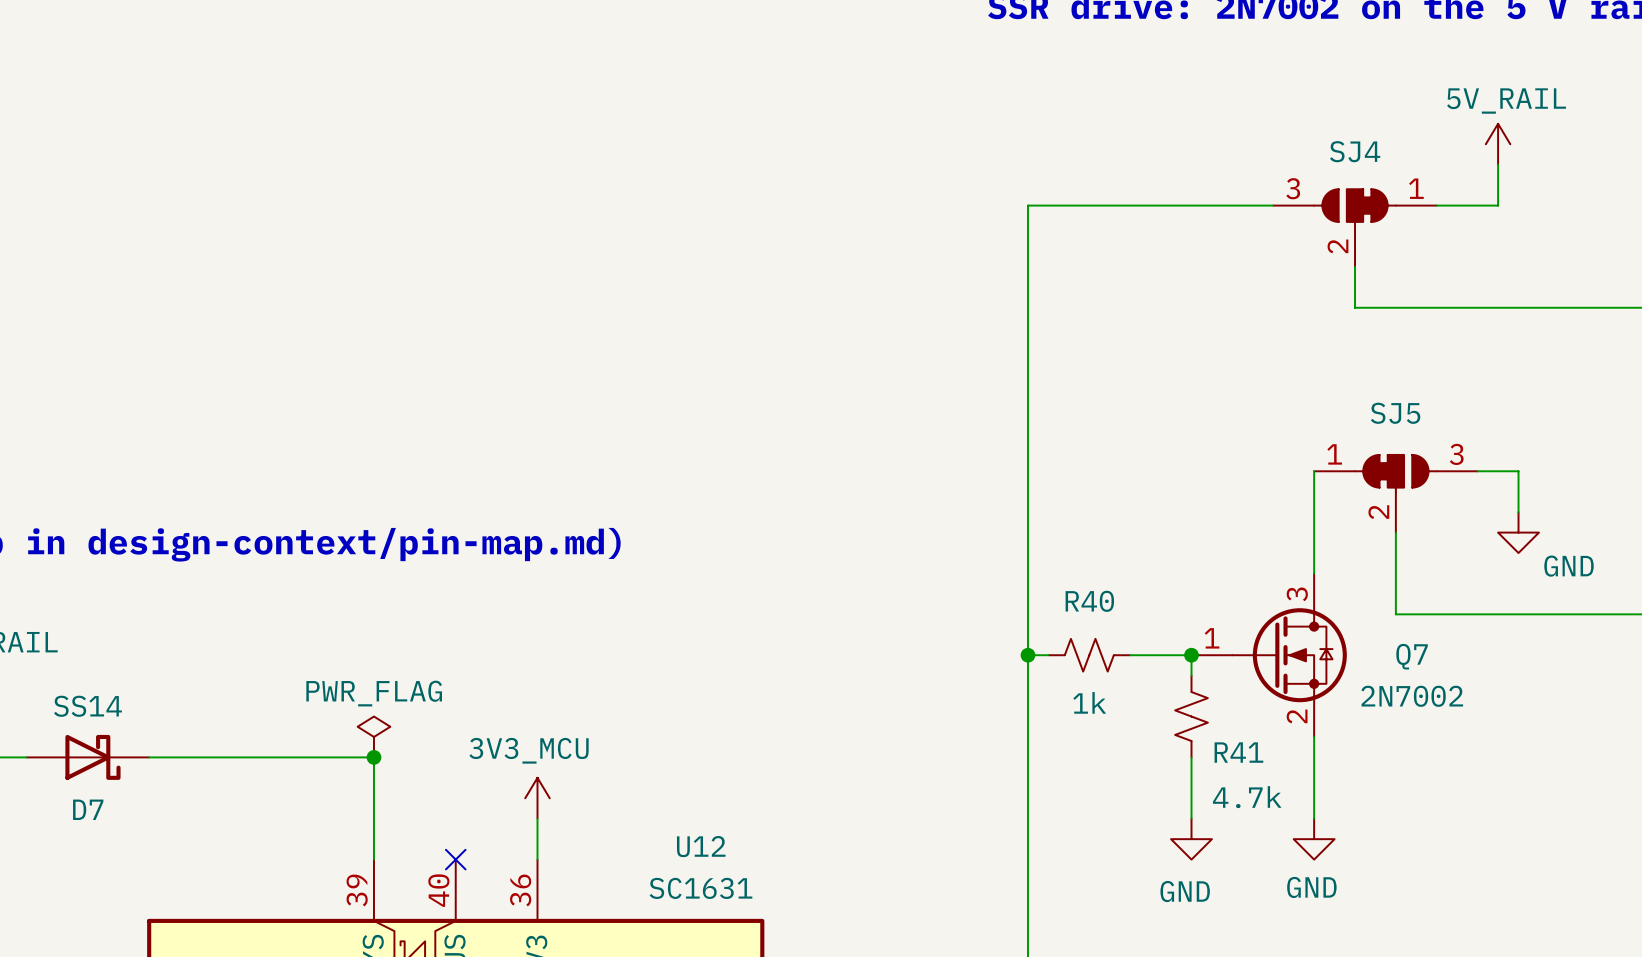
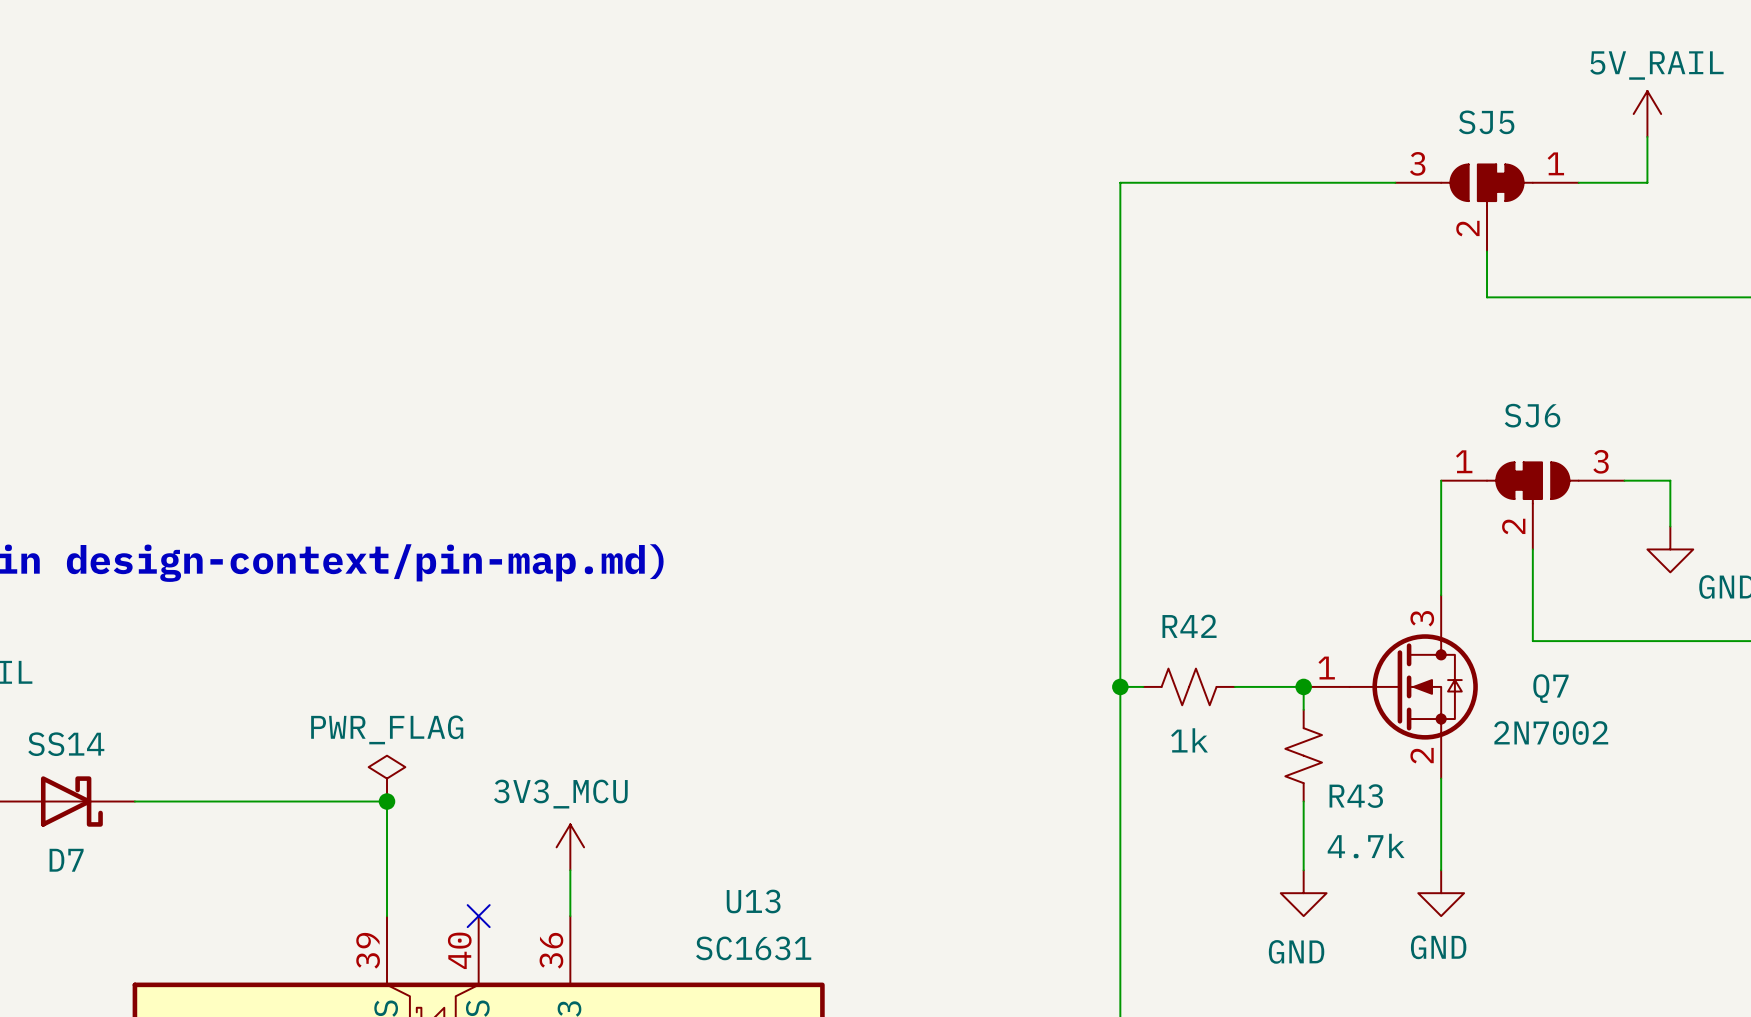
SJ4 name: SJ4 (1355, 151) -> SJ5 (1486, 122)
SJ5 name: SJ5 (1395, 413) -> SJ6 (1532, 415)
R40 name: R40 (1089, 601) -> R42 (1189, 626)
R41 name: R41 (1238, 752) -> R43 (1356, 796)
U12 name: U12 (701, 846) -> U13 (753, 901)

